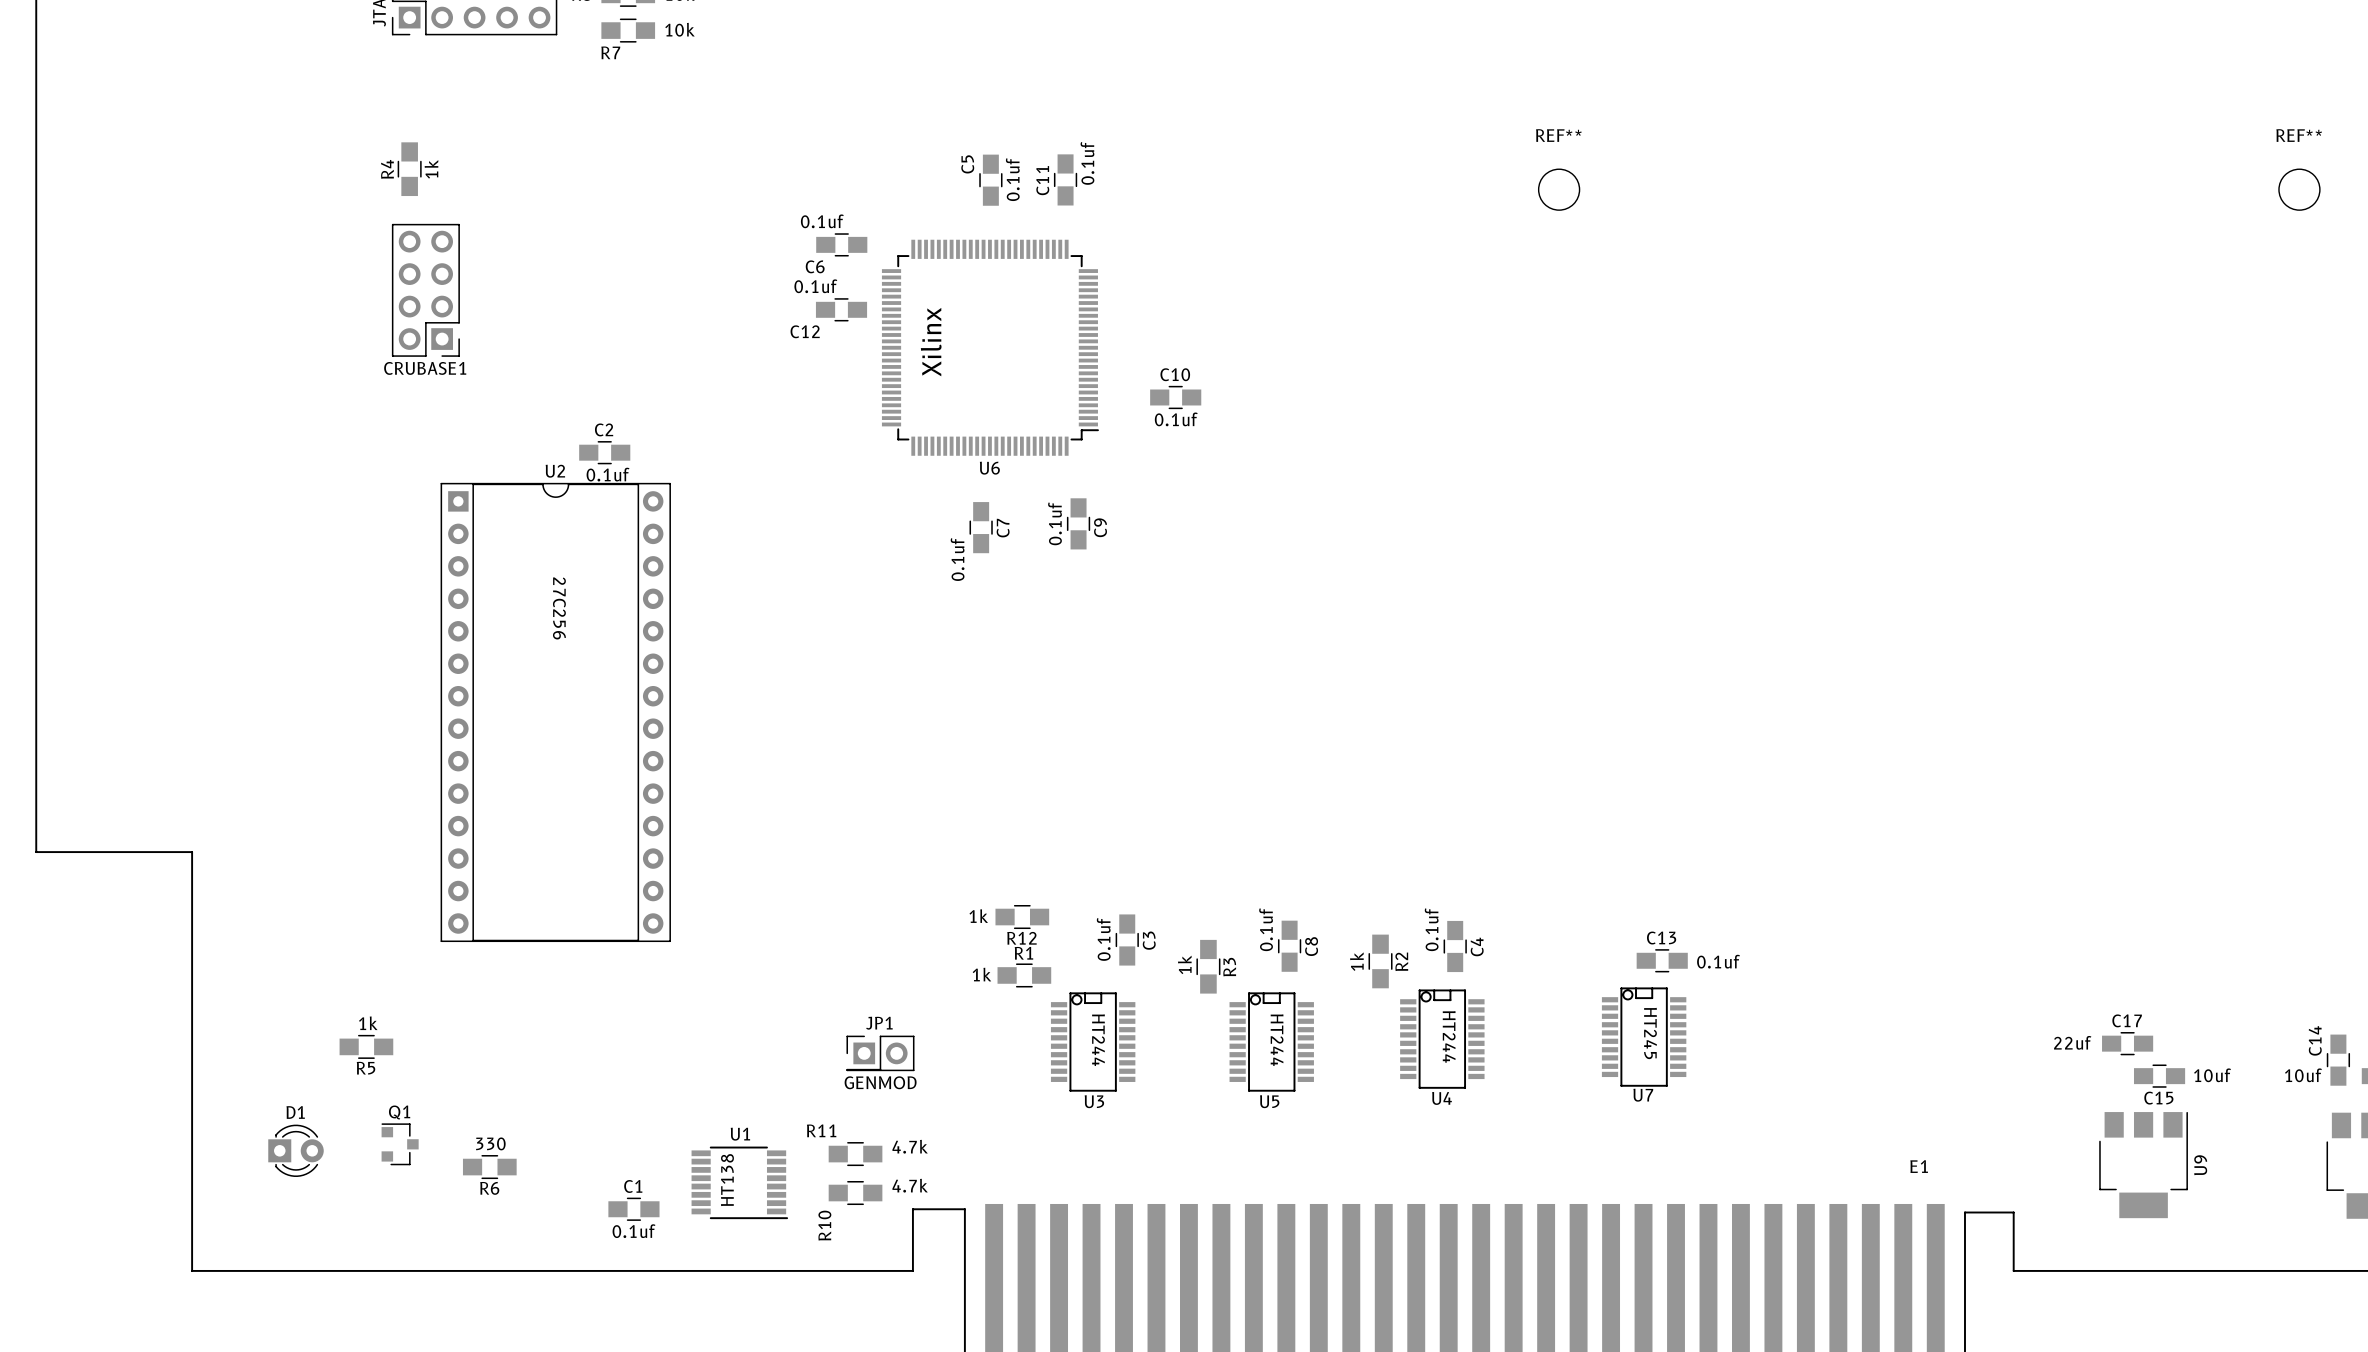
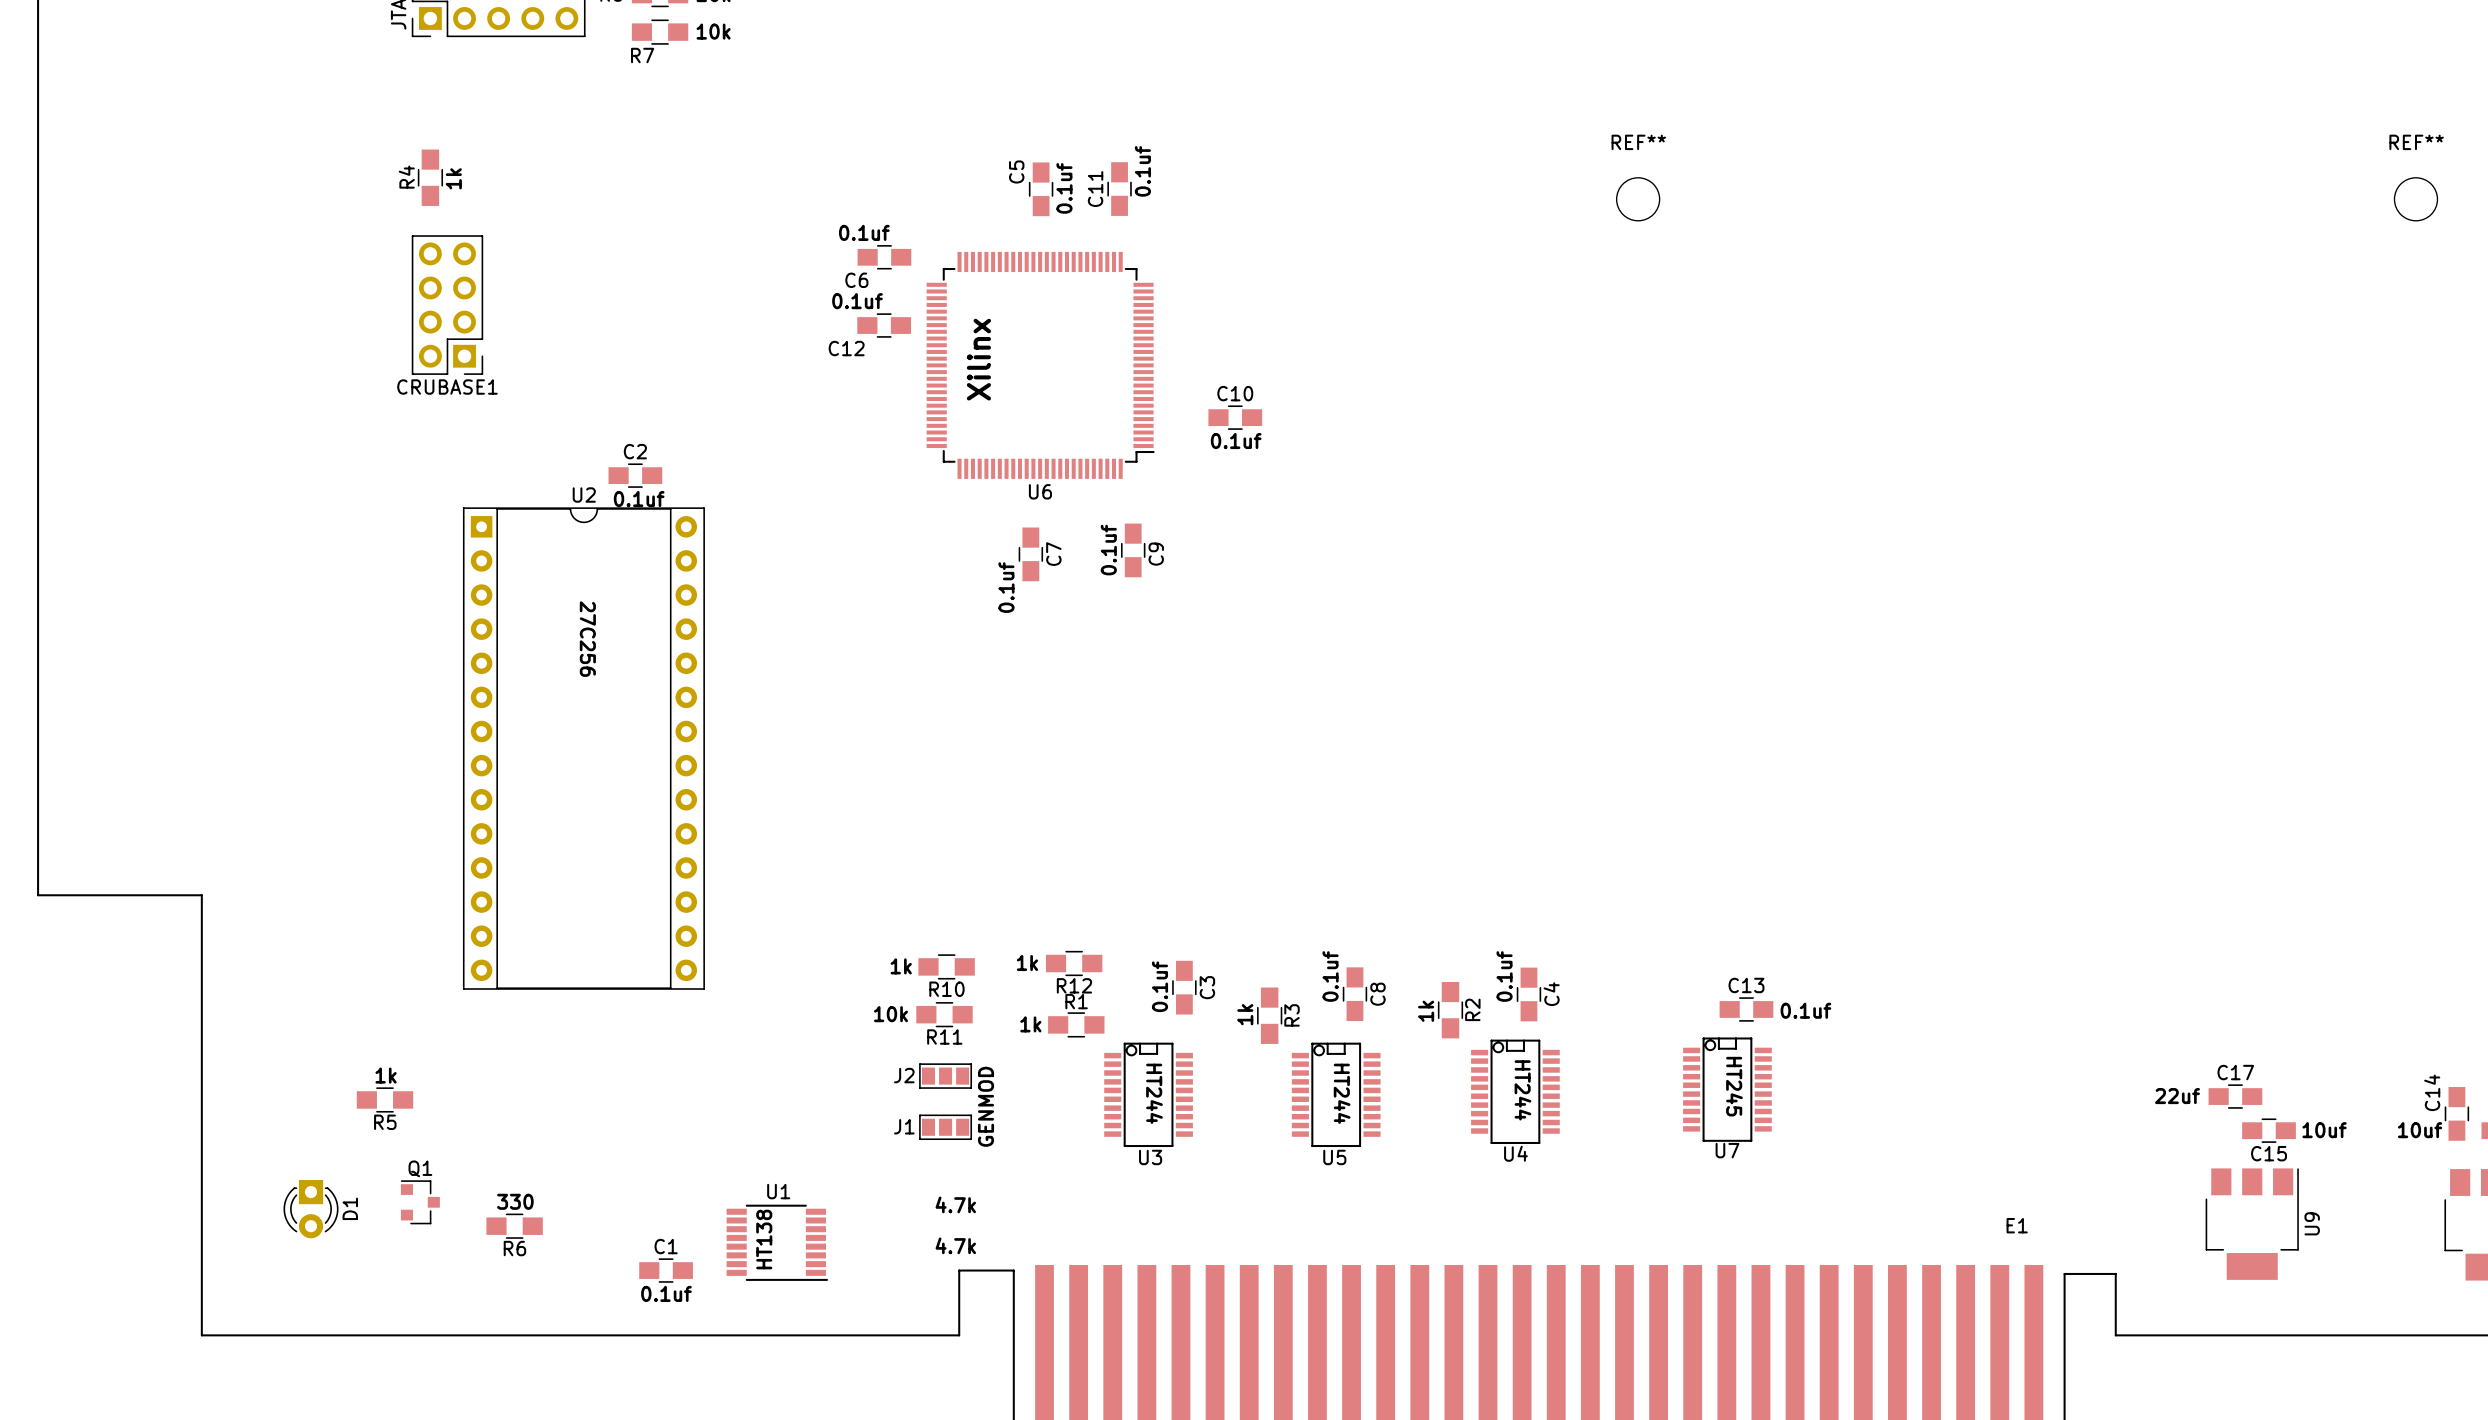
text: none -> 1k (901, 966)
text: none -> 10k (890, 1014)
J2: none -> (945, 1076)
JP1: GENMOD (880, 1053) -> none
text: none -> GENMOD (986, 1106)
J1: none -> (945, 1127)
R11 name position: R11 (821, 1130) -> R11 (944, 1037)
D1 rotation: 0° (296, 1150) -> 90° clockwise (311, 1209)
R11 position: (855, 1154) -> (944, 1014)
R10 position: (855, 1193) -> (946, 966)
R10 name rotation: 0° (824, 1225) -> 90° clockwise (946, 989)

